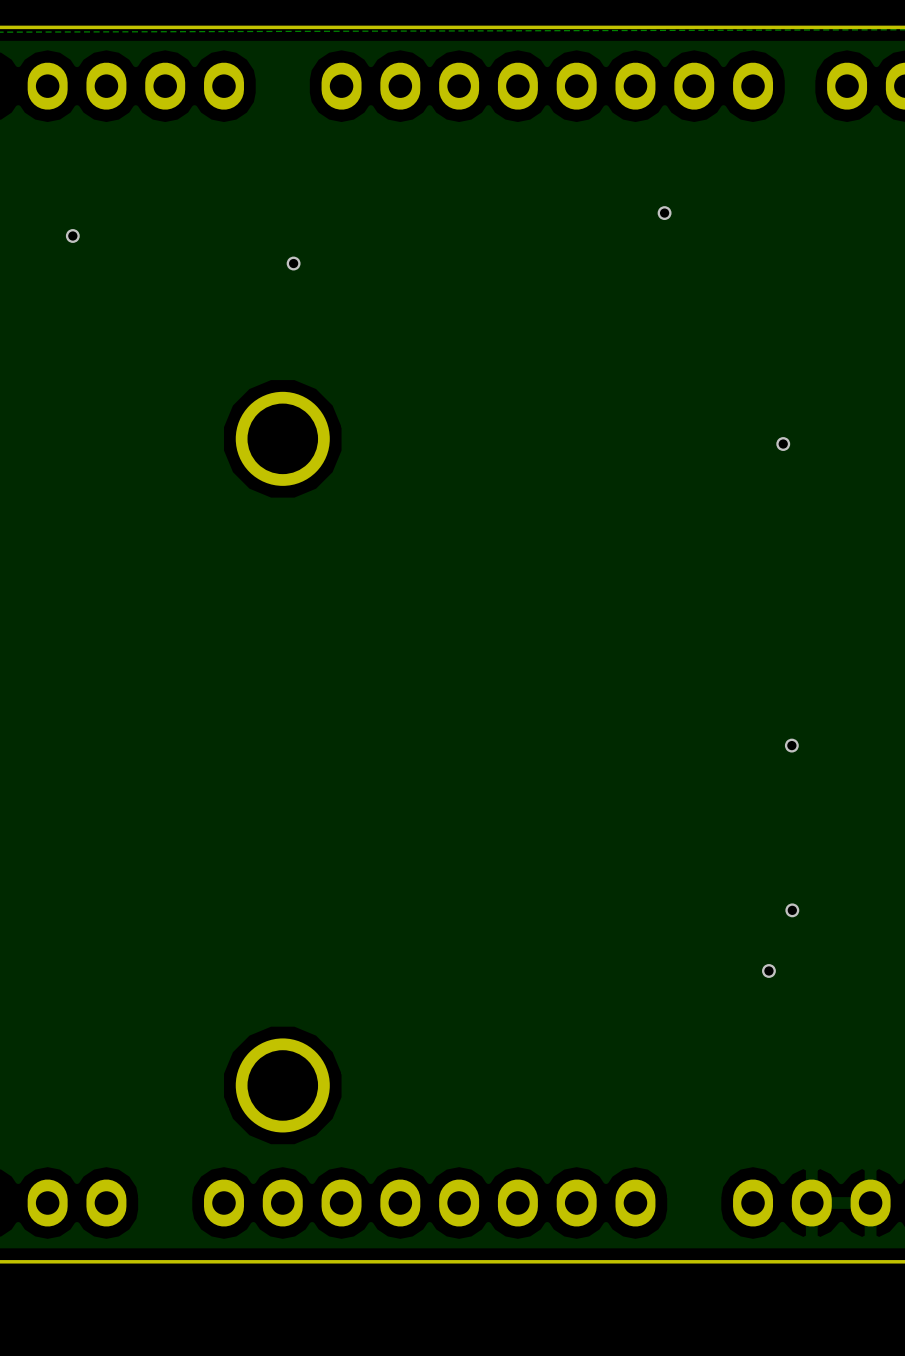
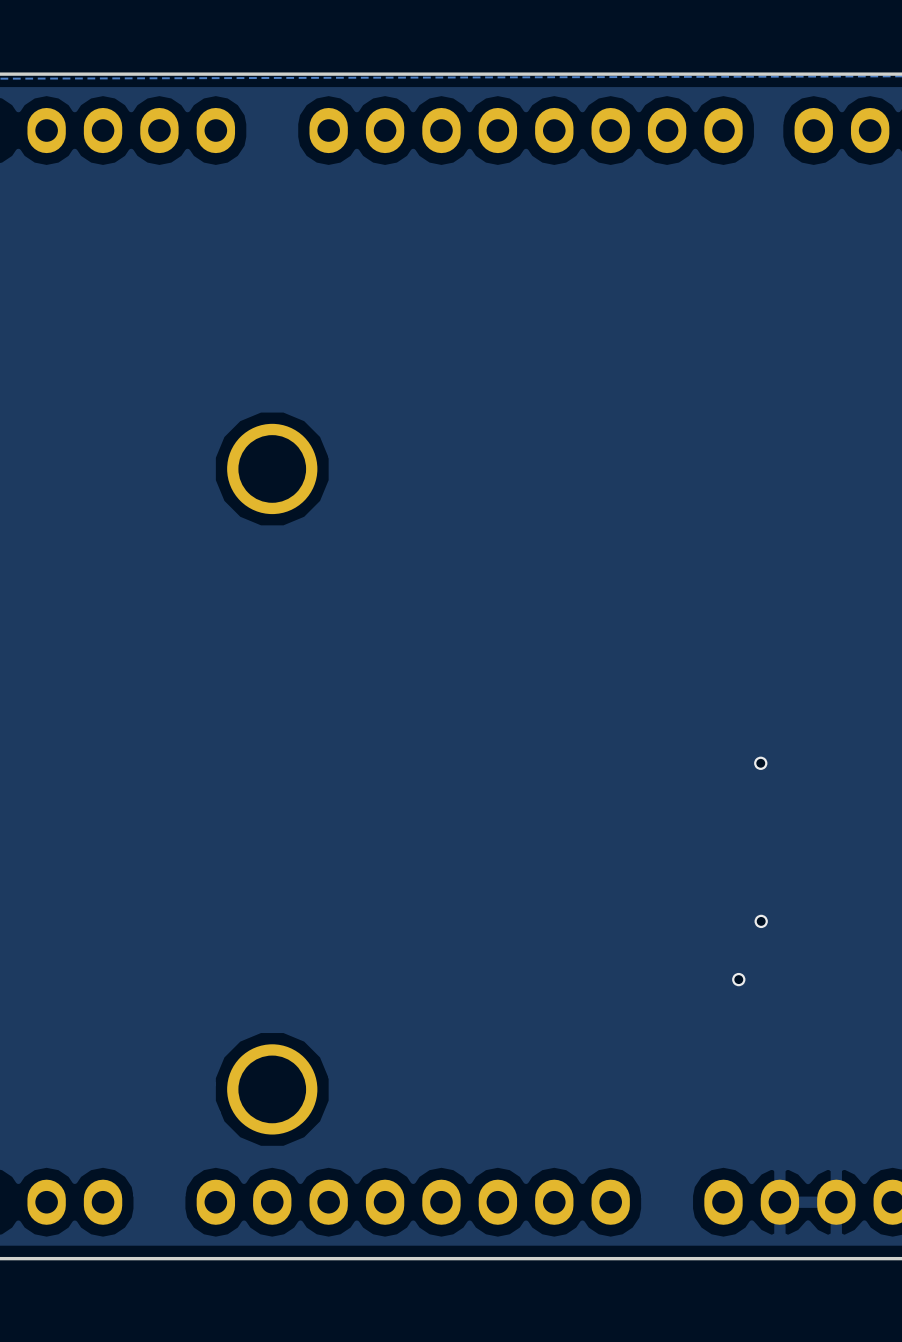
via: (664, 213) -> none
via: (72, 235) -> none
via: (293, 263) -> none
via: (783, 444) -> none

